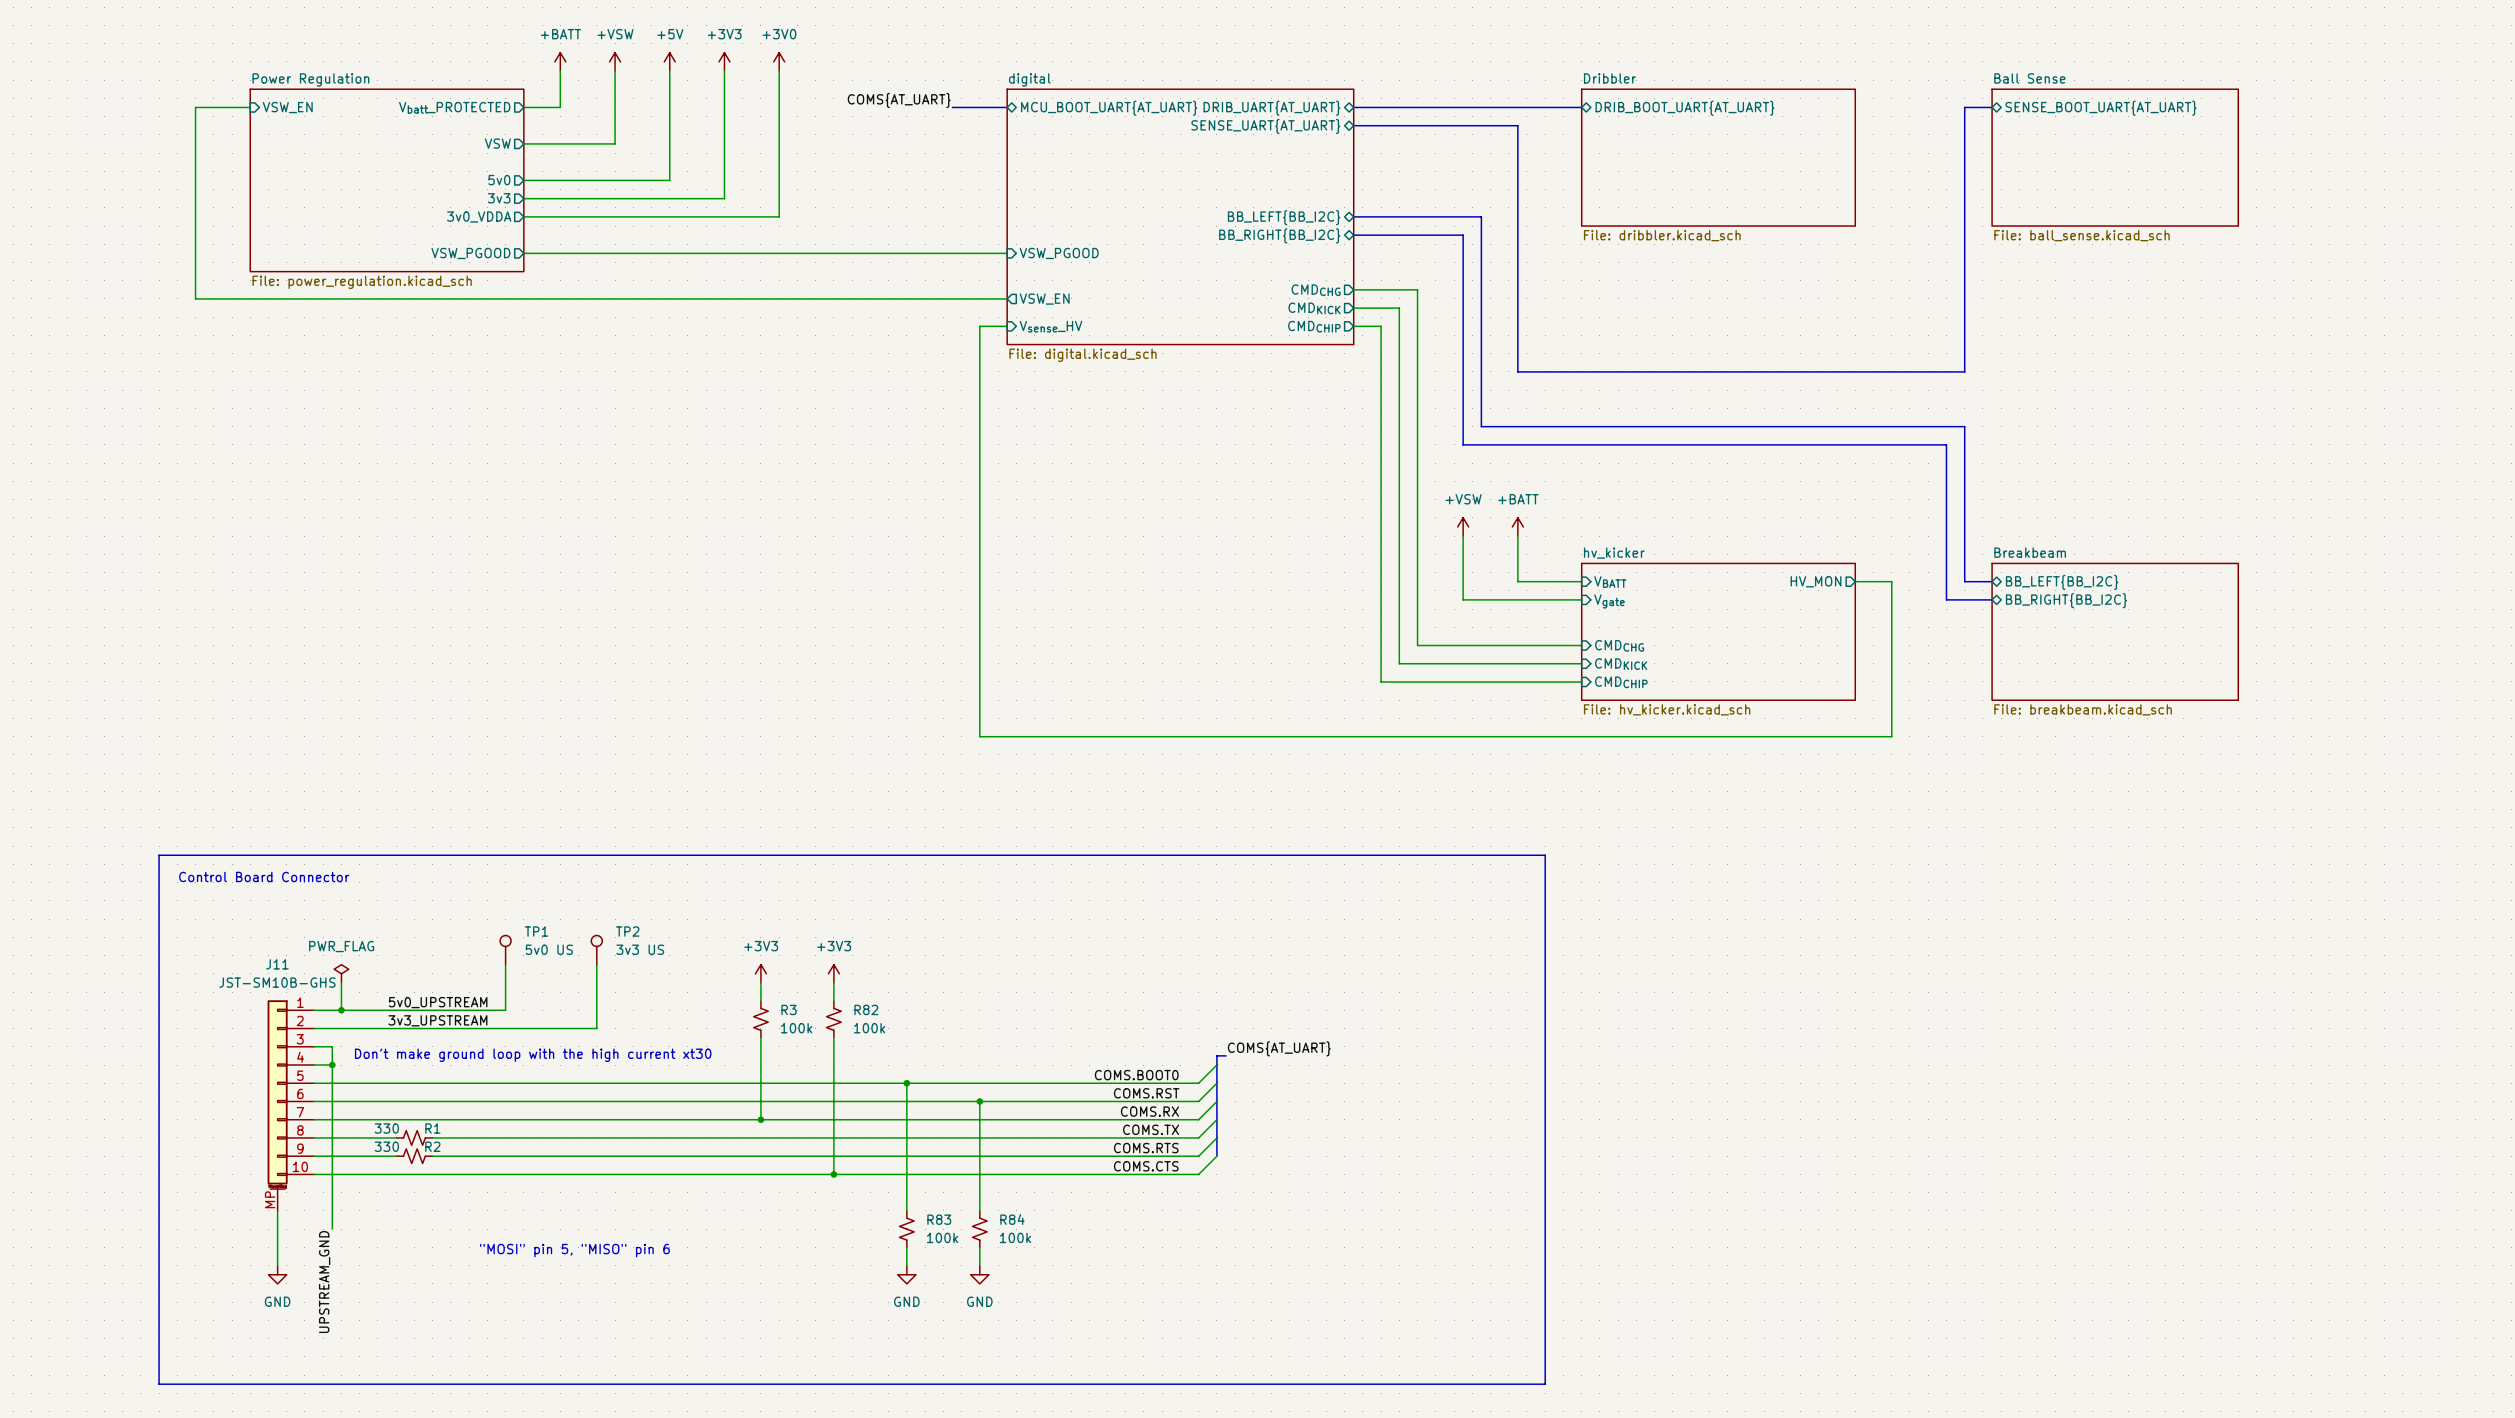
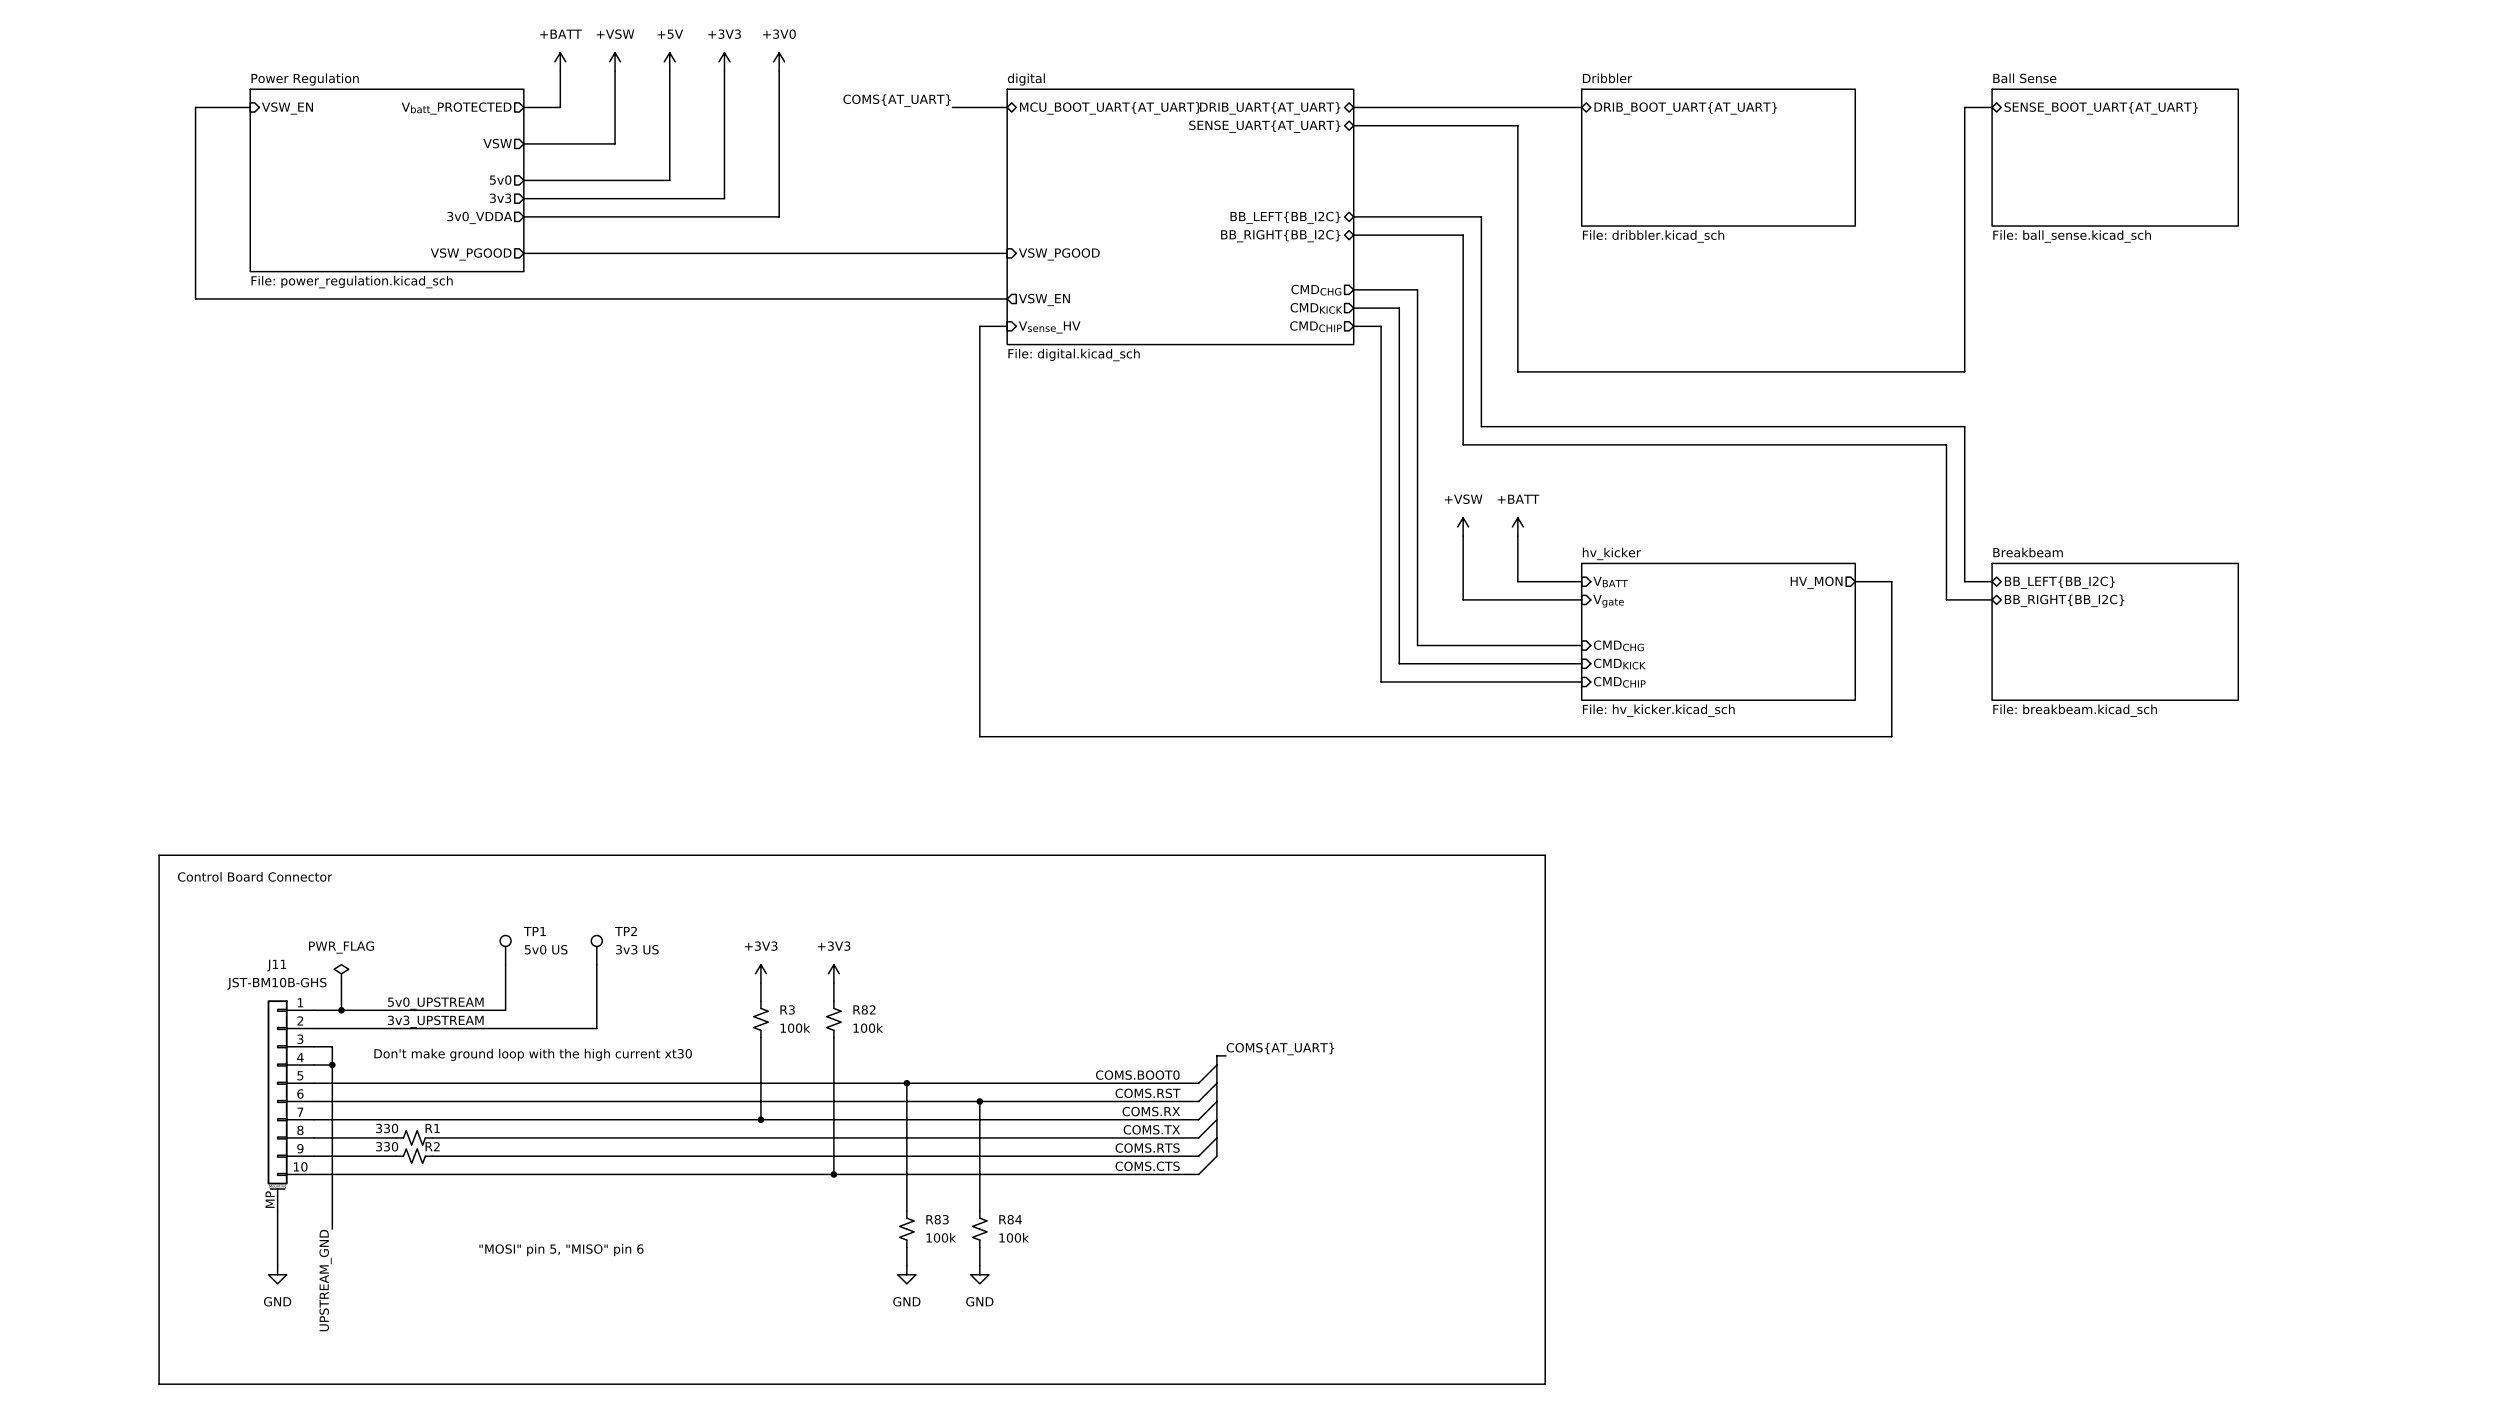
J11 value: JST-SM10B-GHS (277, 982) -> JST-BM10B-GHS (276, 983)

